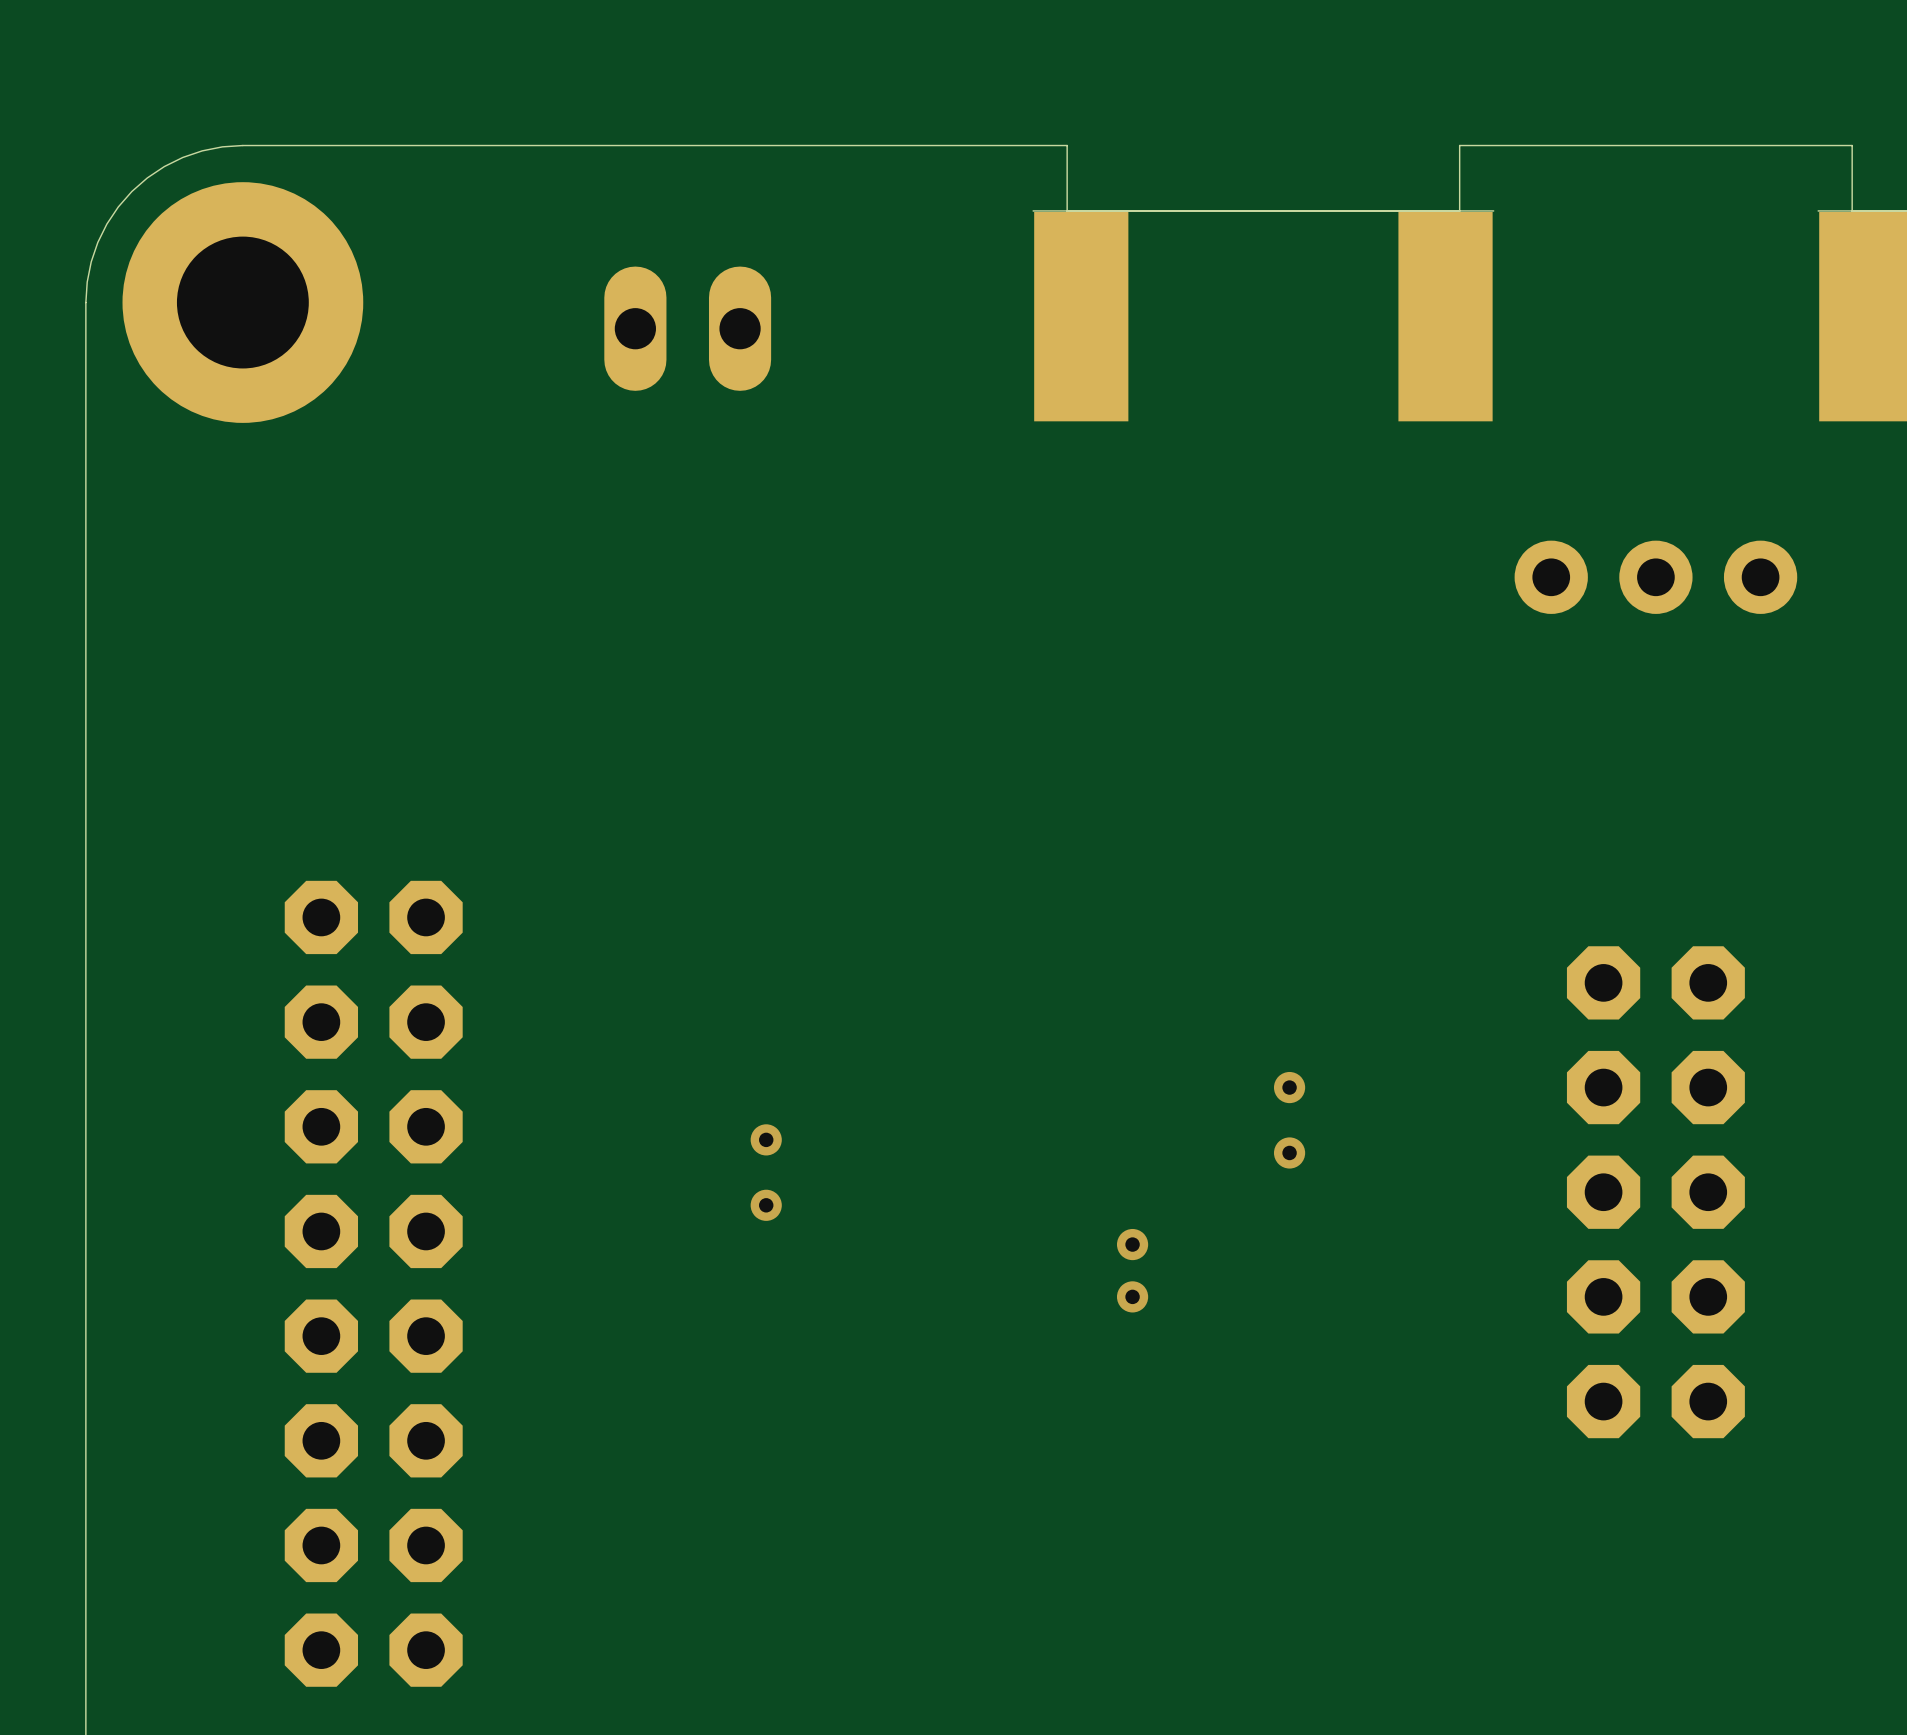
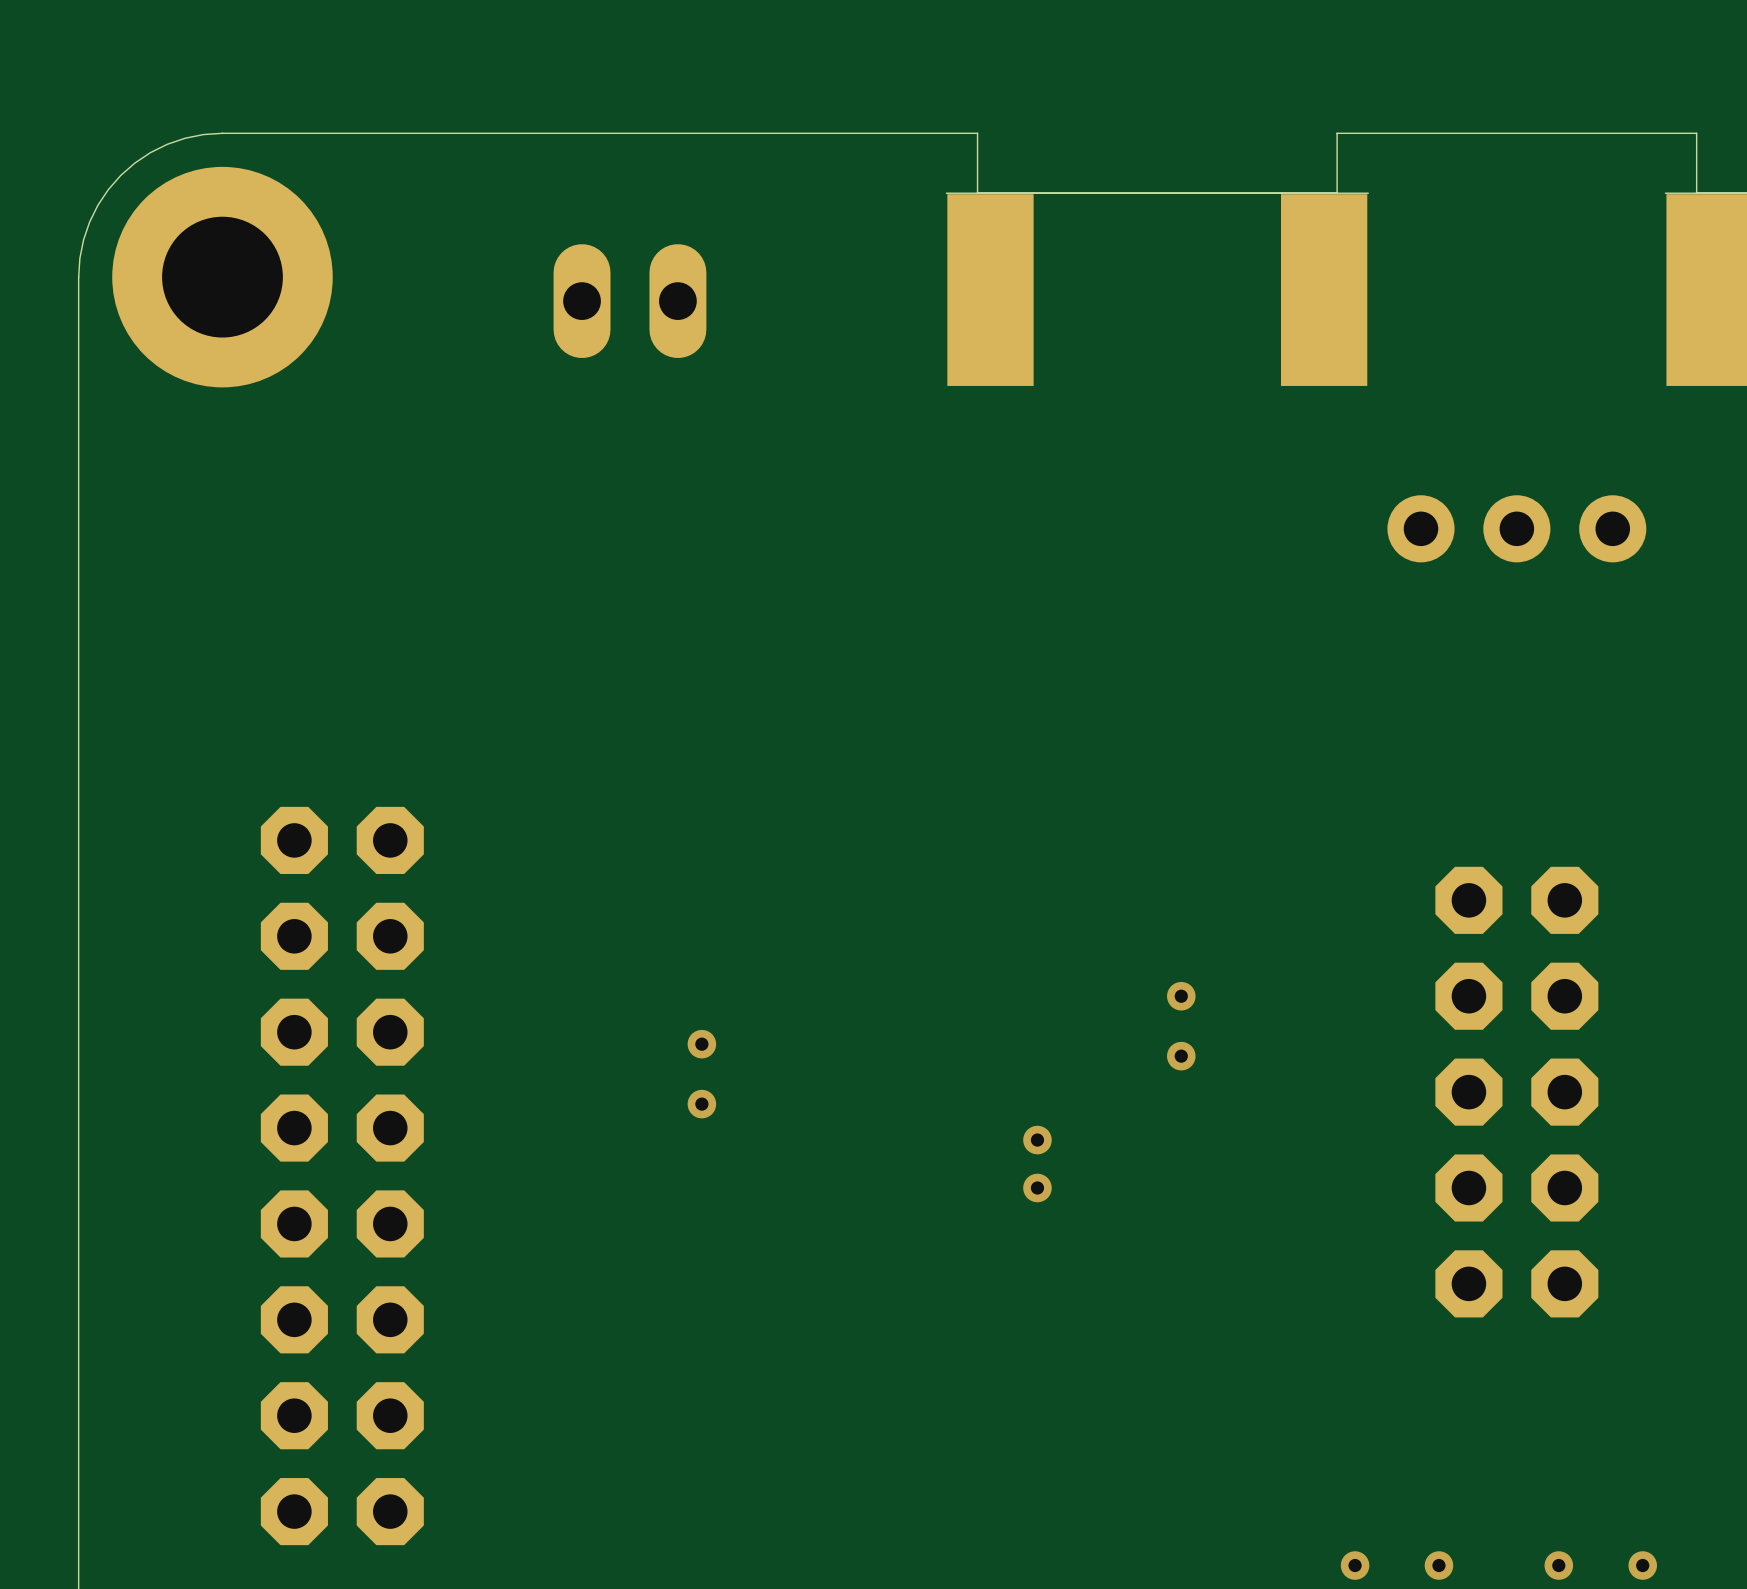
via: none -> (1355, 1565)
via: none -> (1438, 1565)
via: none -> (1558, 1565)
via: none -> (1642, 1565)

